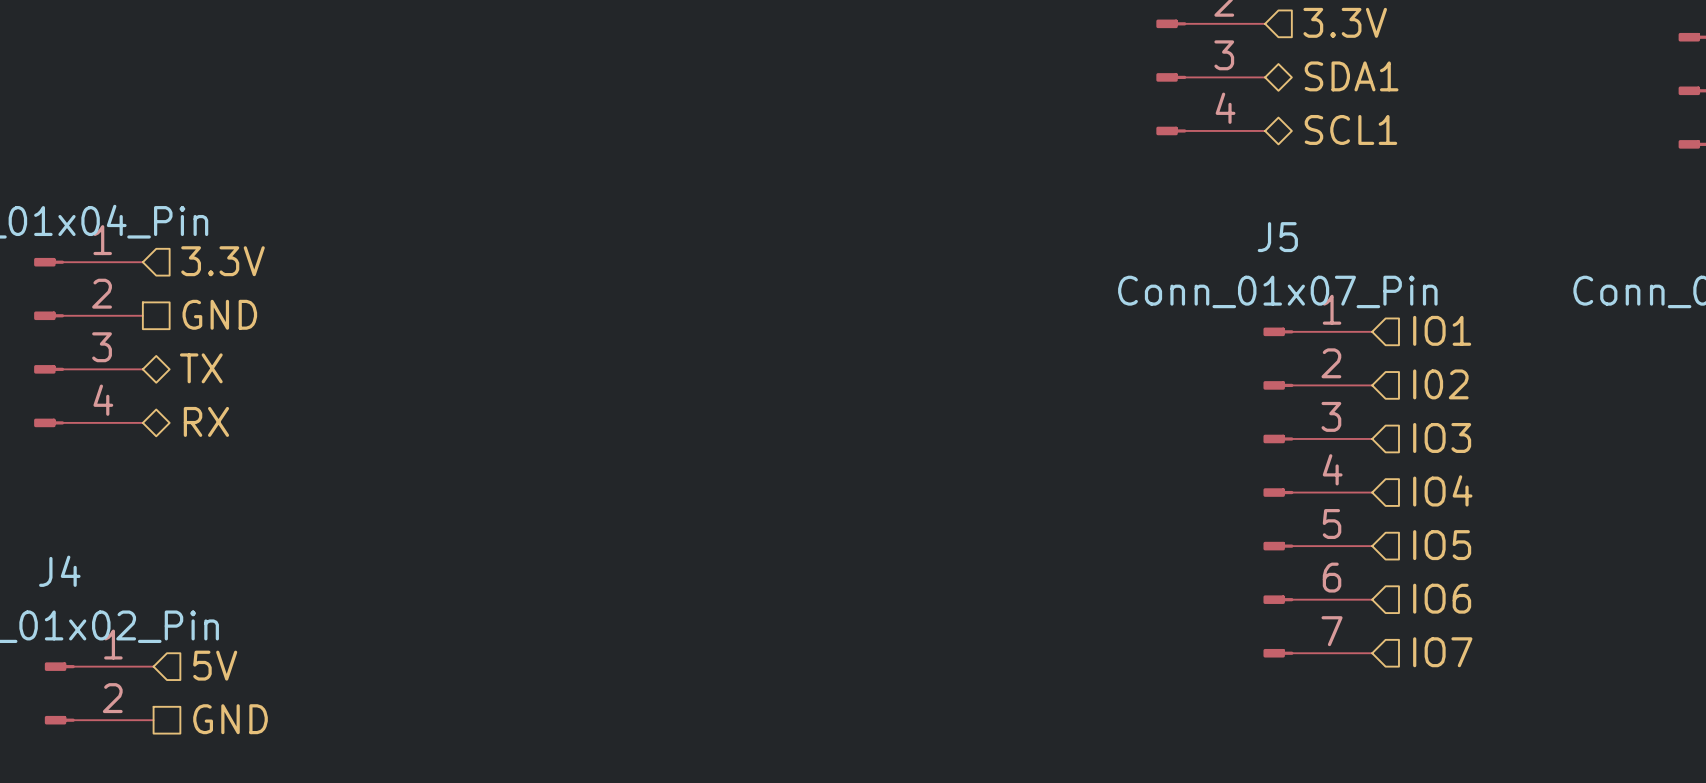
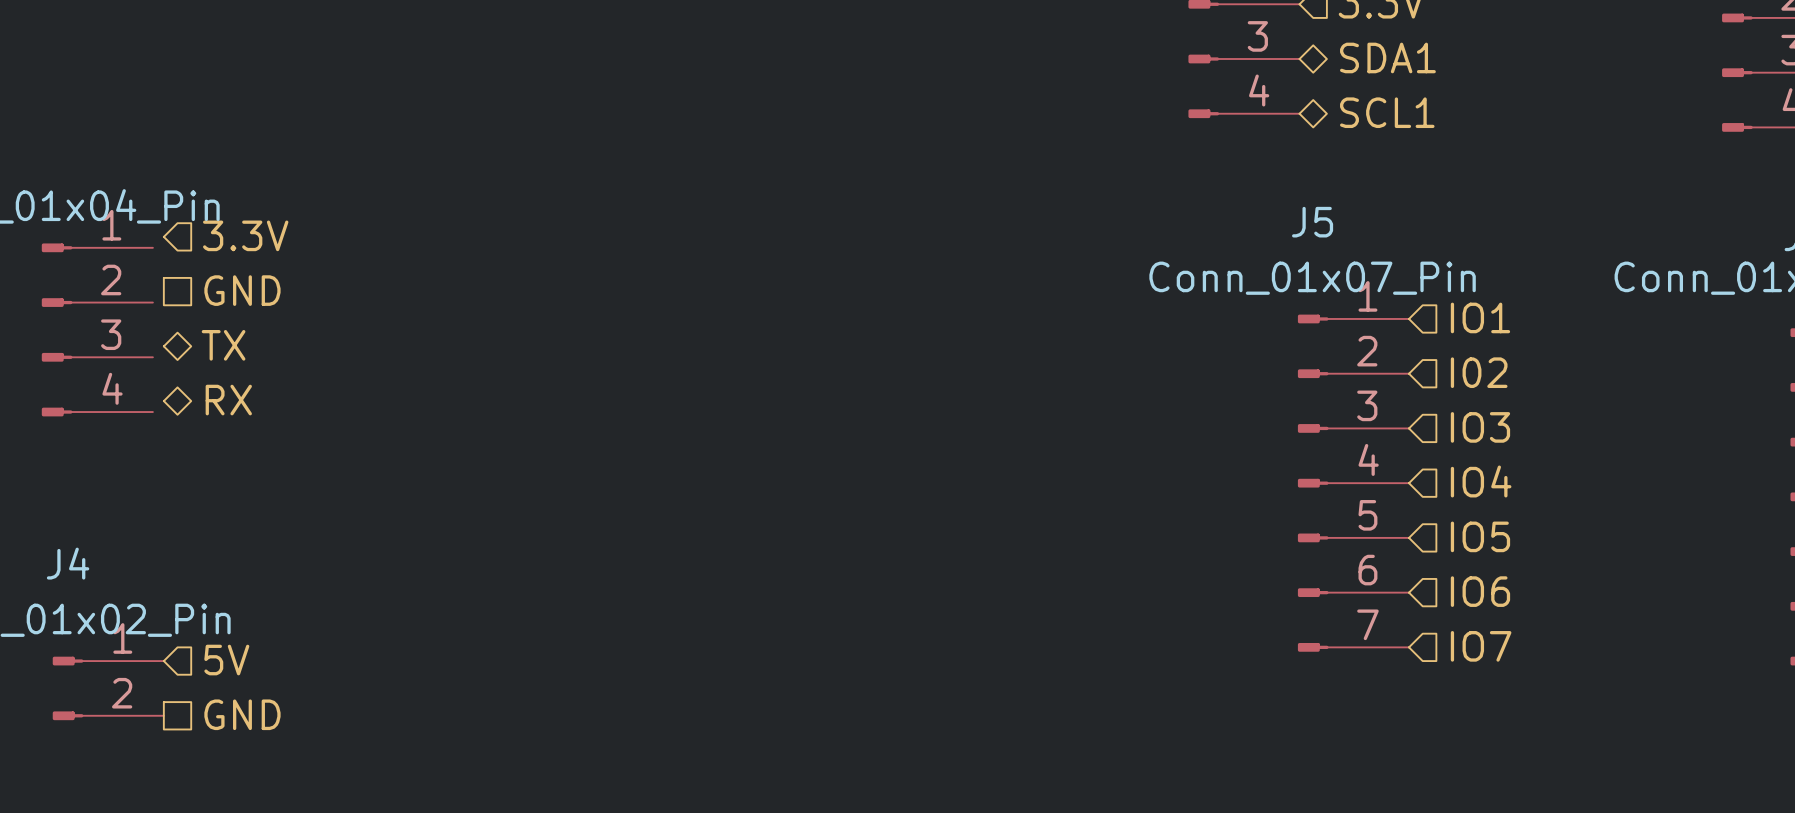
hierarchical label position: 3.3V (222, 261) -> 3.3V (245, 235)
hierarchical label position: GND (219, 314) -> GND (242, 290)
hierarchical label position: TX (201, 368) -> TX (223, 345)
hierarchical label position: RX (206, 421) -> RX (228, 400)

